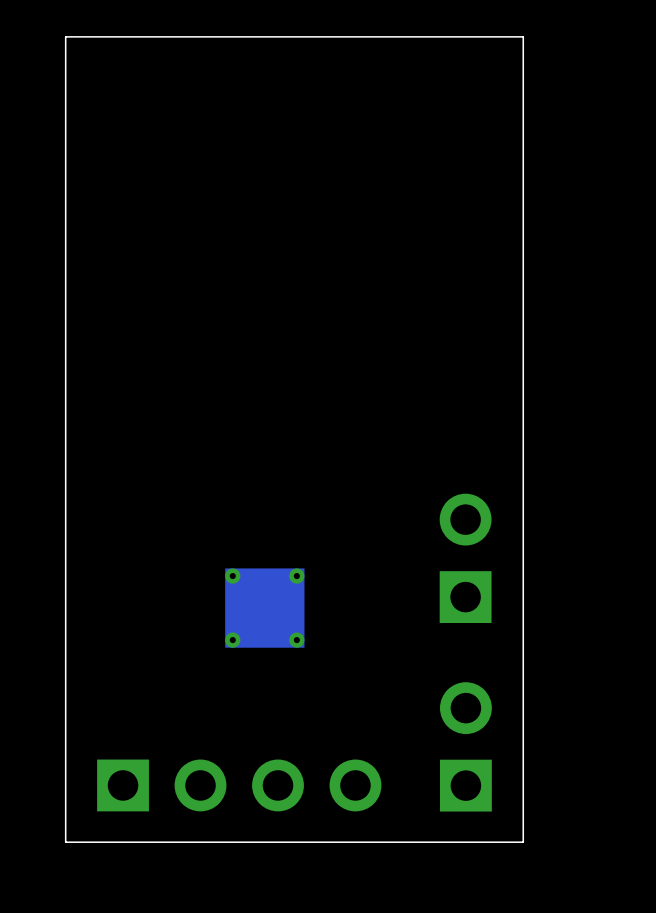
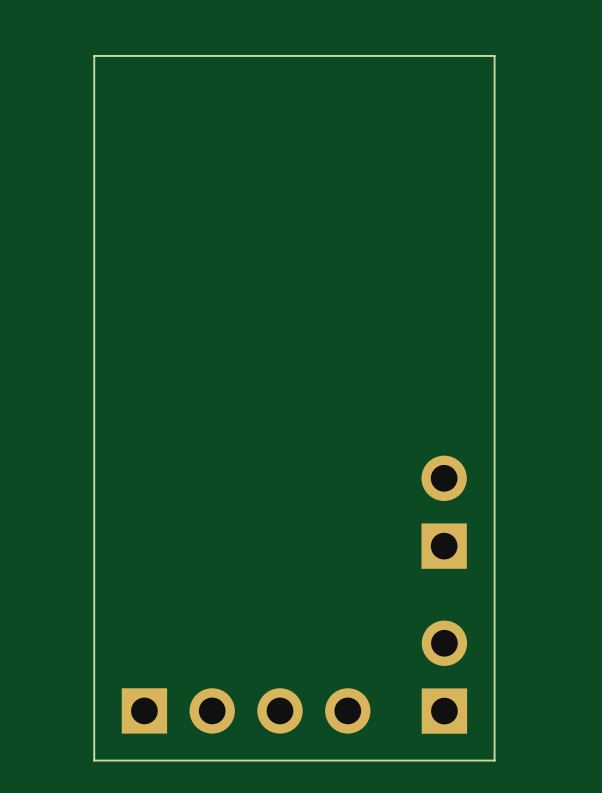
part: (264, 608) -> none

